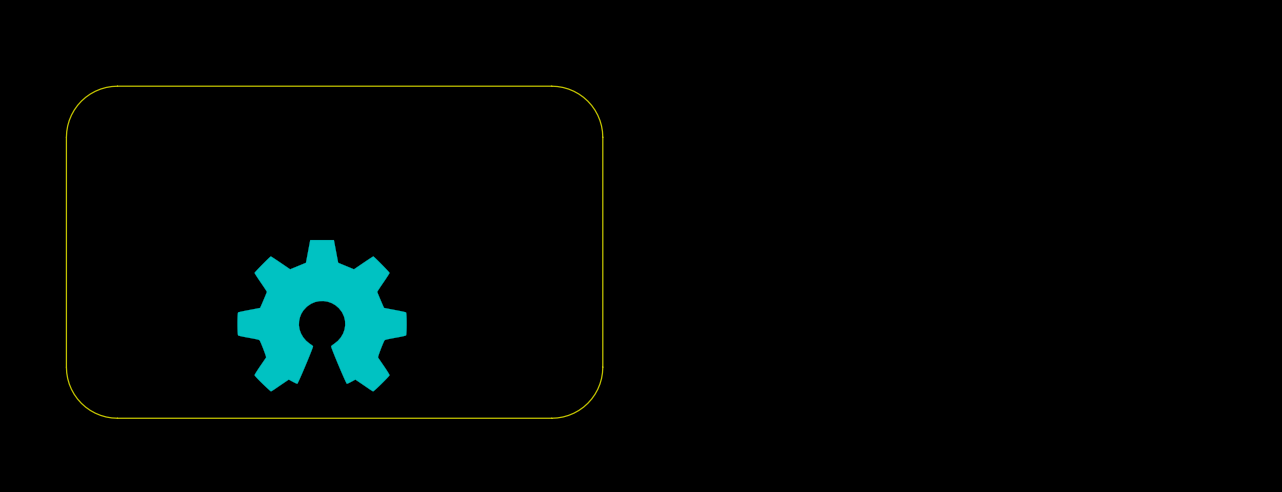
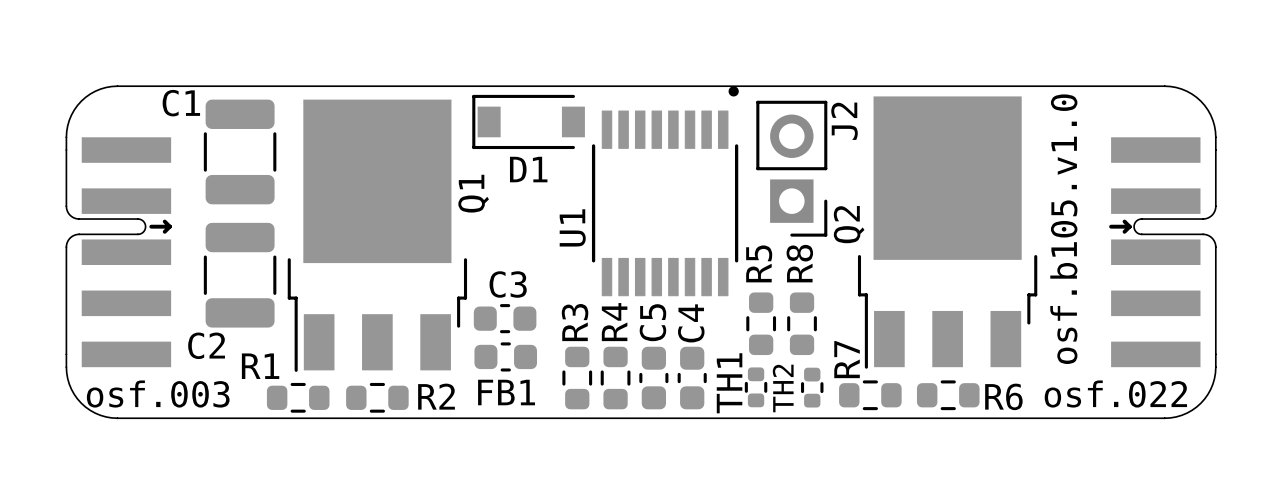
board edge: (551, 86) (568, 89) (587, 101) (597, 115) (602, 137) (601, 378) (594, 394) (583, 407) (568, 415) (551, 418) -> (551, 86) (1170, 86) (1191, 94) (1204, 105) (1214, 125) (1215, 150)
D1: none -> (528, 121)
board edge: (66, 150) (66, 354) -> none
C1: none -> (240, 151)
J2: none -> (791, 168)
U1: none -> (665, 191)
text: none -> osf.b105.v1.0 (1063, 229)
Q2: none -> (947, 232)
Q1: none -> (377, 235)
drawing: [237, 239, 407, 392] -> none
part: none -> (118, 252)
part: none -> (1162, 252)
C2: none -> (240, 275)
C3: none -> (505, 318)
R5: none -> (761, 323)
R8: none -> (802, 323)
board edge: none -> (1215, 354) (1214, 378) (1204, 399) (1191, 410) (1170, 417) (551, 418)
FB1: none -> (505, 356)
R3: none -> (577, 378)
R4: none -> (615, 378)
C5: none -> (653, 378)
C4: none -> (692, 378)
TH1: none -> (756, 387)
TH2: none -> (812, 387)
text: none -> osf.003 (158, 394)
text: none -> osf.022 (1115, 394)
R7: none -> (870, 395)
R6: none -> (948, 395)
R1: none -> (298, 397)
R2: none -> (377, 397)

